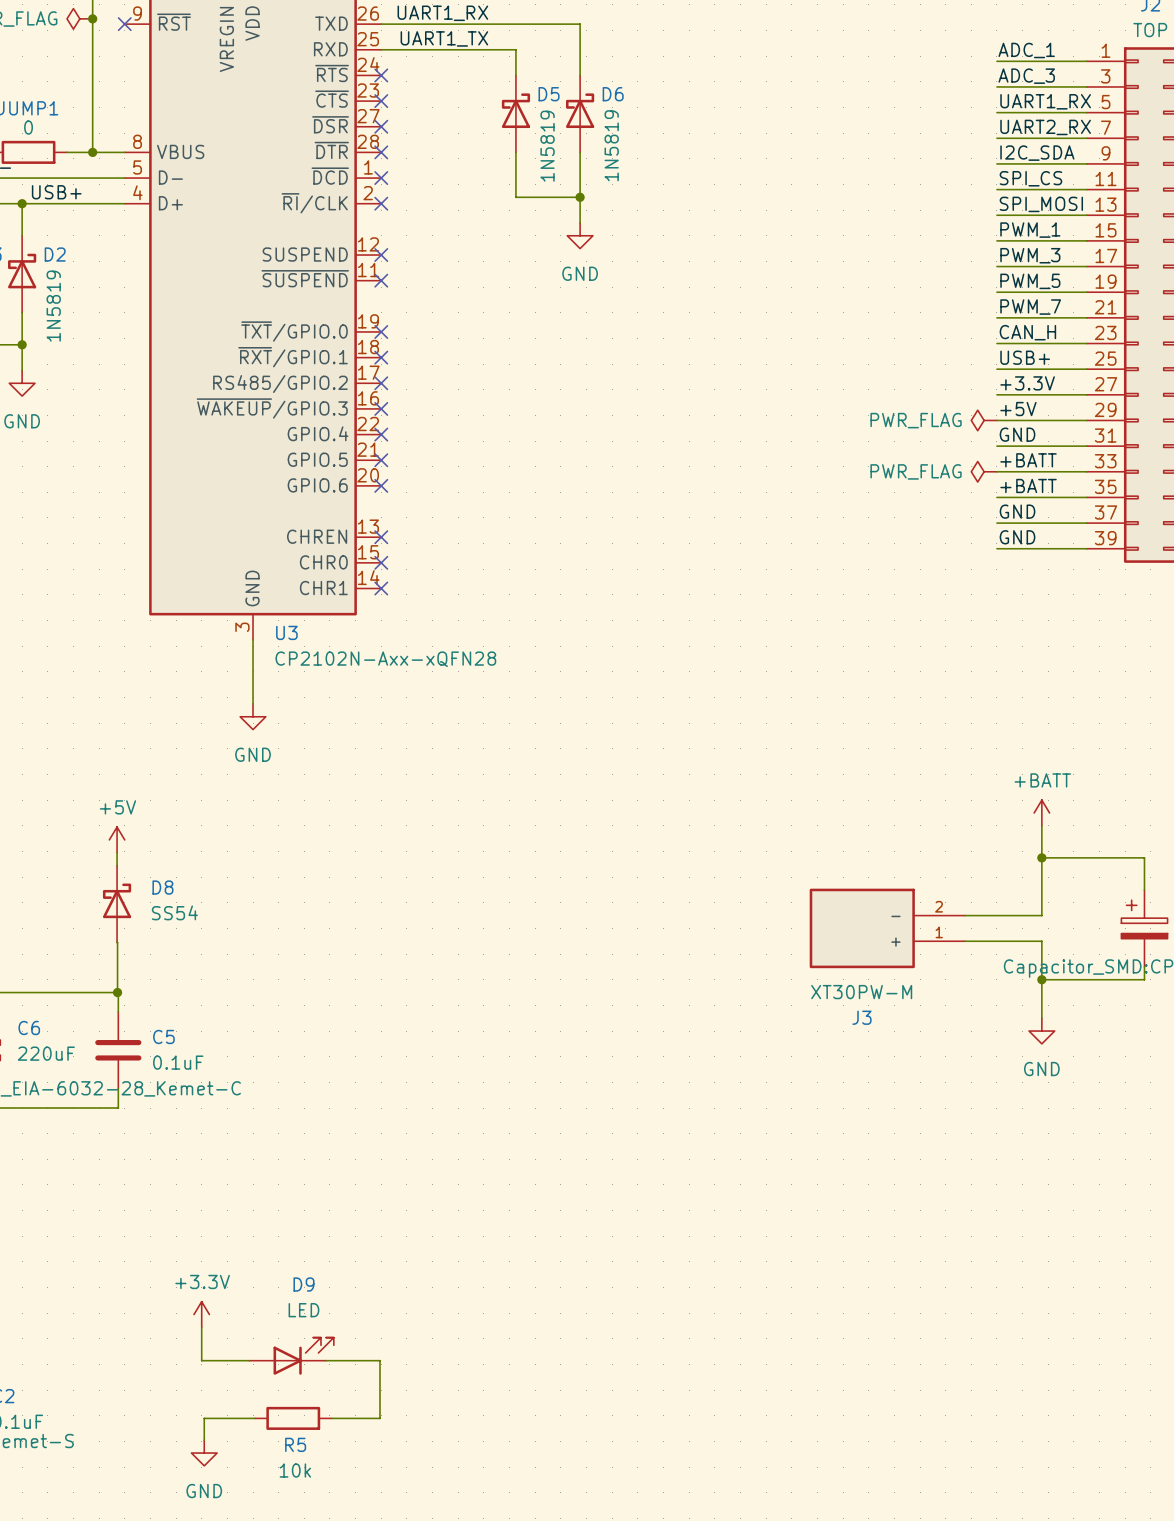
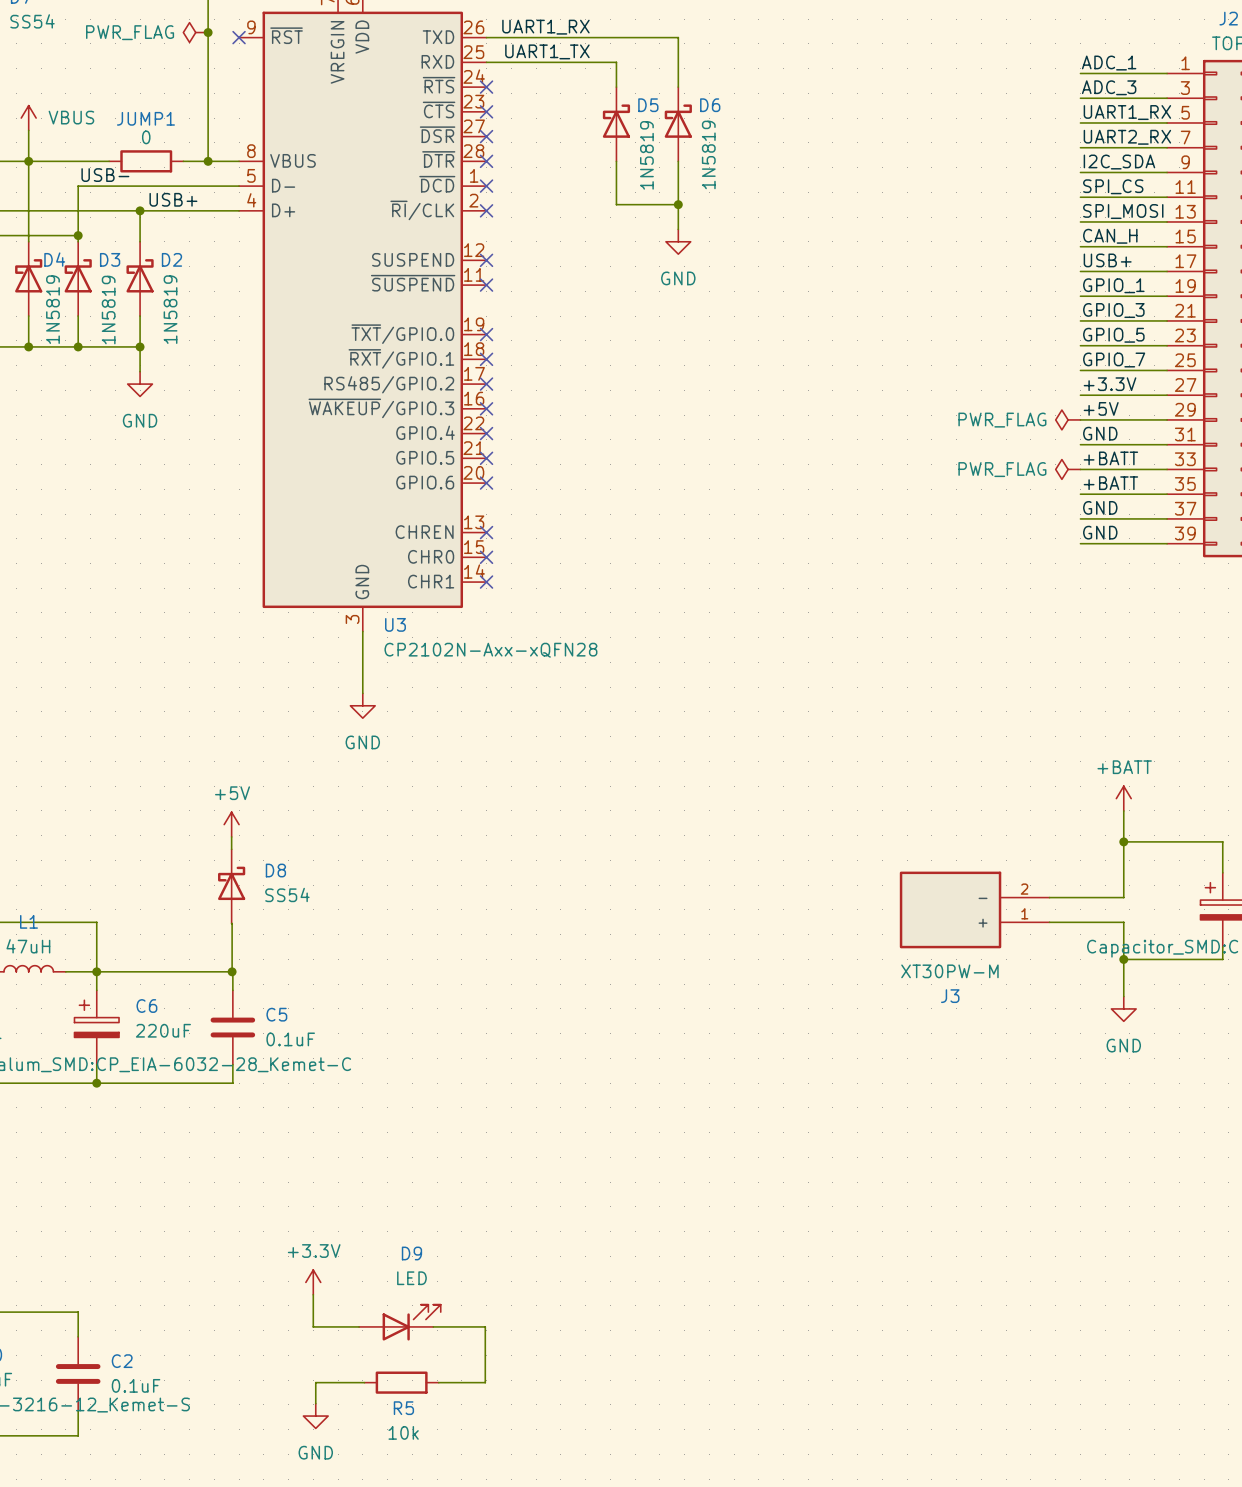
label: PWM_1 (1030, 230) -> CAN_H (1110, 236)
label: PWM_3 (1030, 255) -> USB+ (1107, 260)
label: PWM_5 (1030, 281) -> GPIO_1 (1113, 285)
label: PWM_7 (1030, 307) -> GPIO_3 (1113, 310)
label: CAN_H (1027, 332) -> GPIO_5 (1113, 335)
label: USB+ (1025, 357) -> GPIO_7 (1114, 360)

